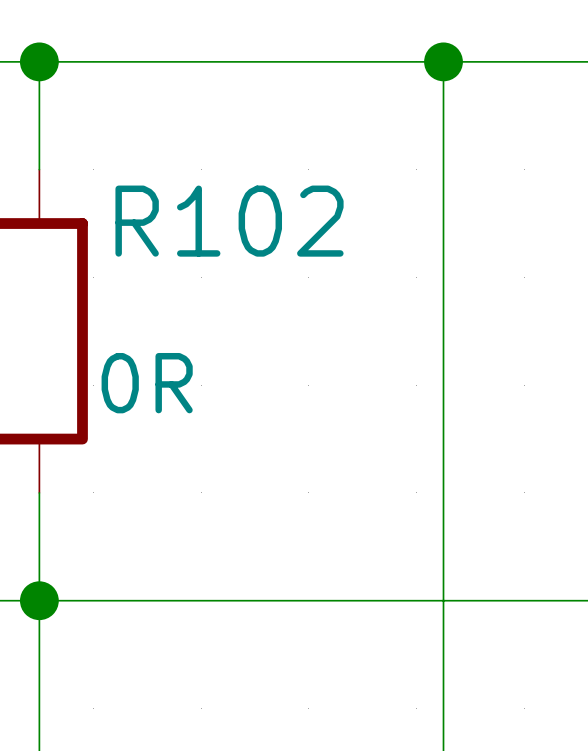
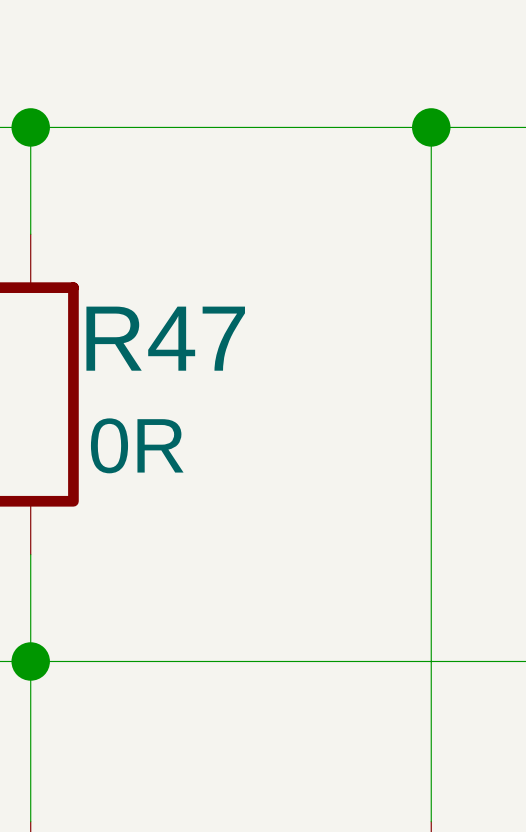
R102 name: R102 (229, 221) -> R47 (165, 338)

